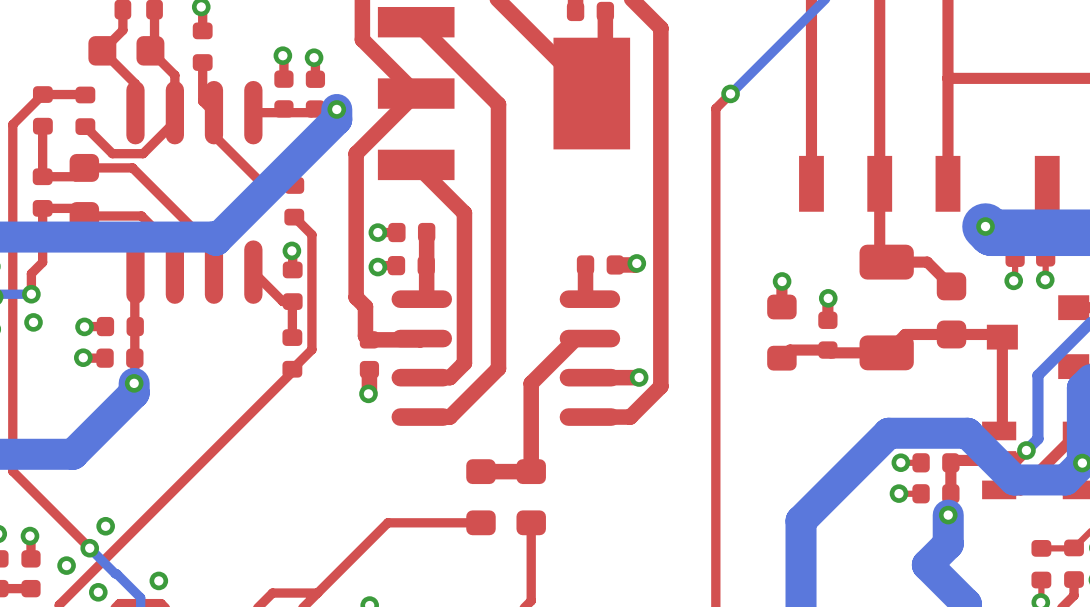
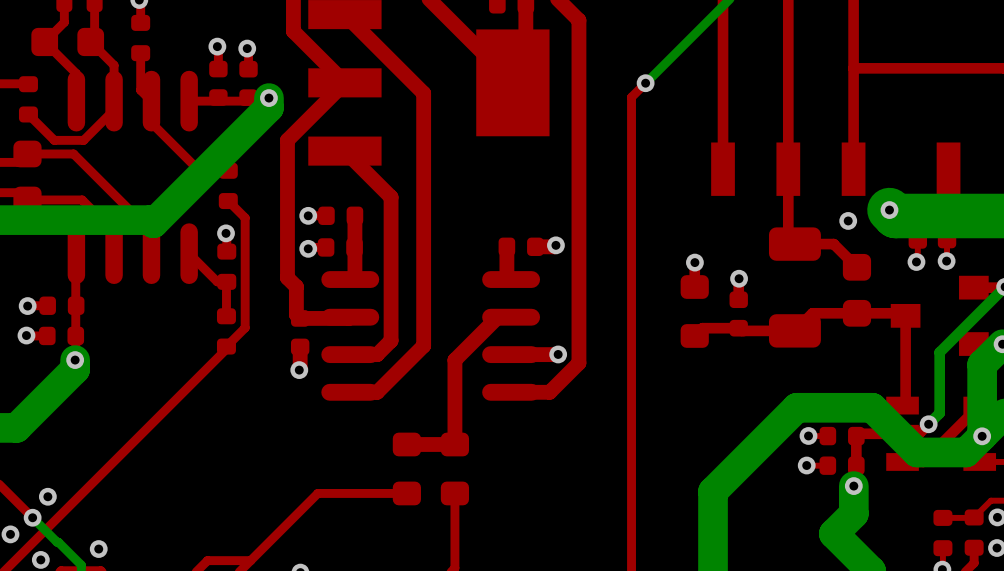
via: none -> (848, 220)

